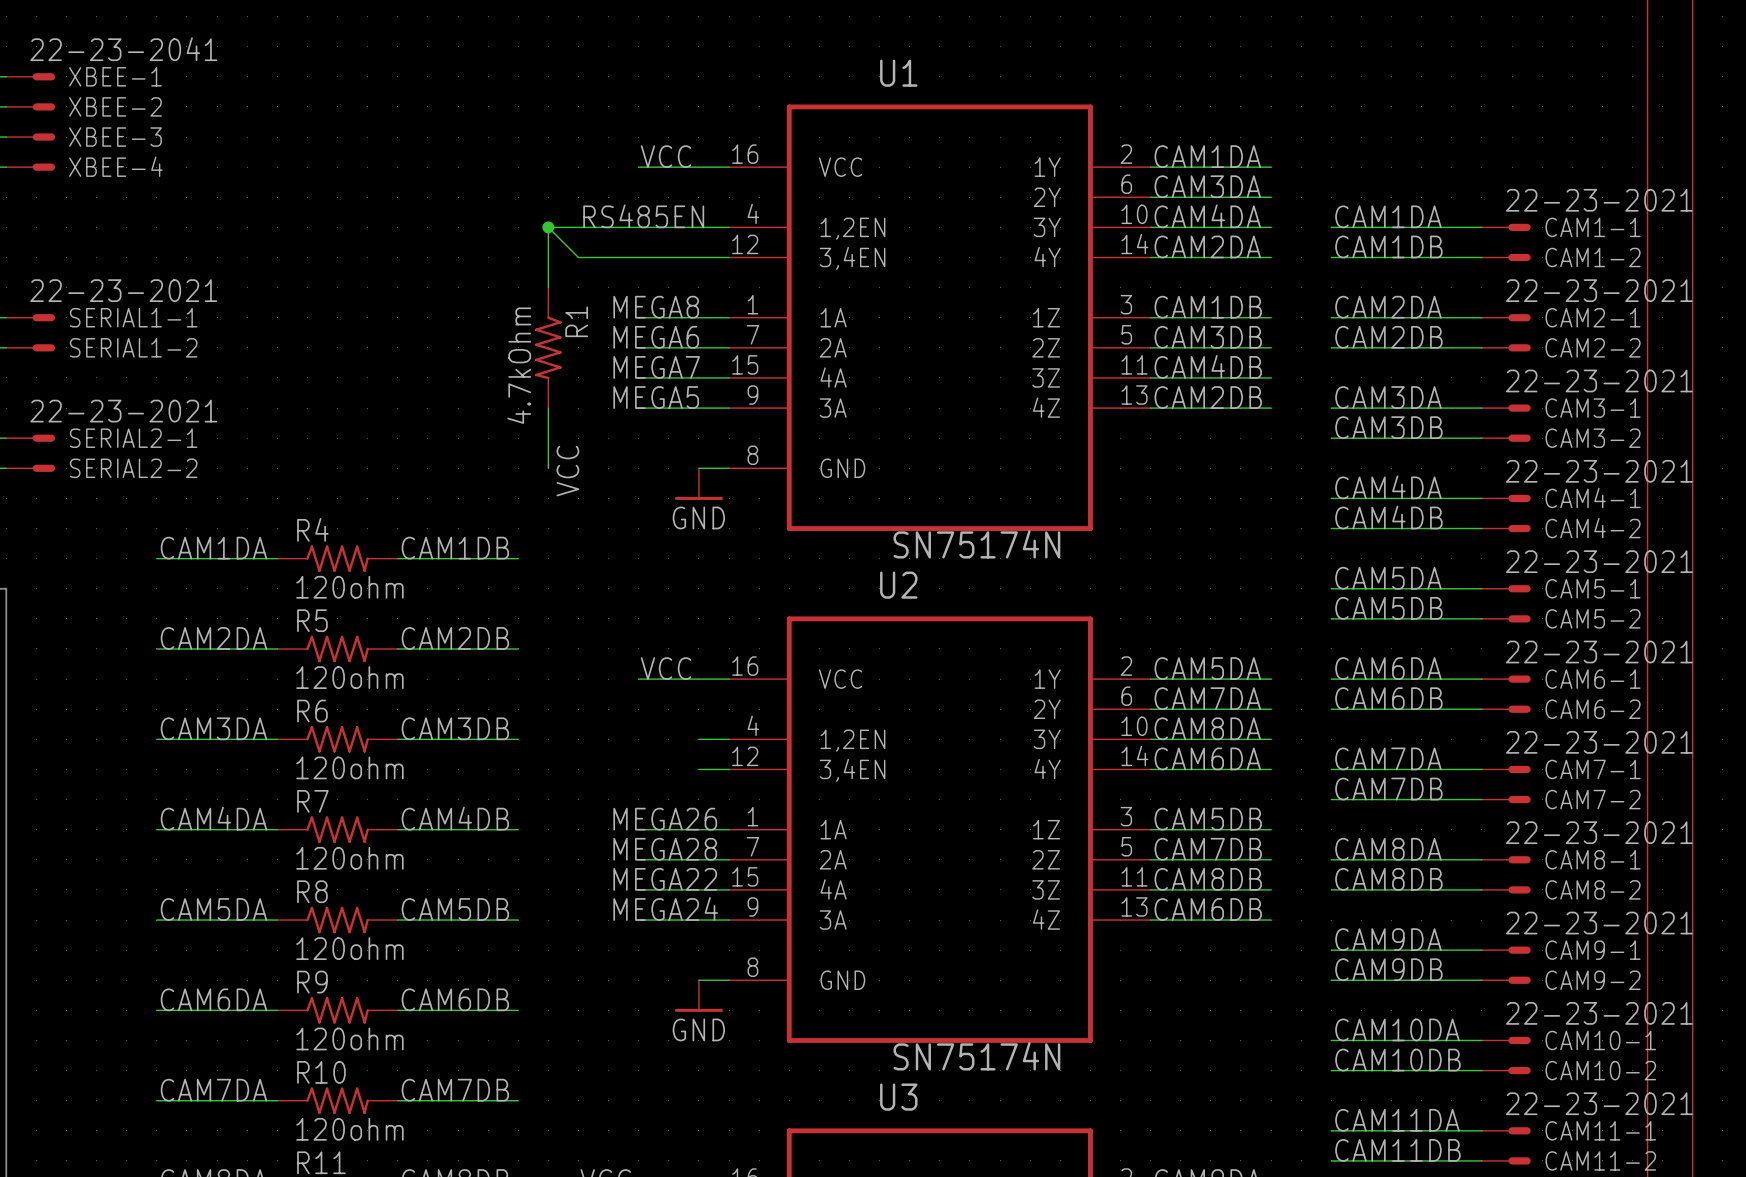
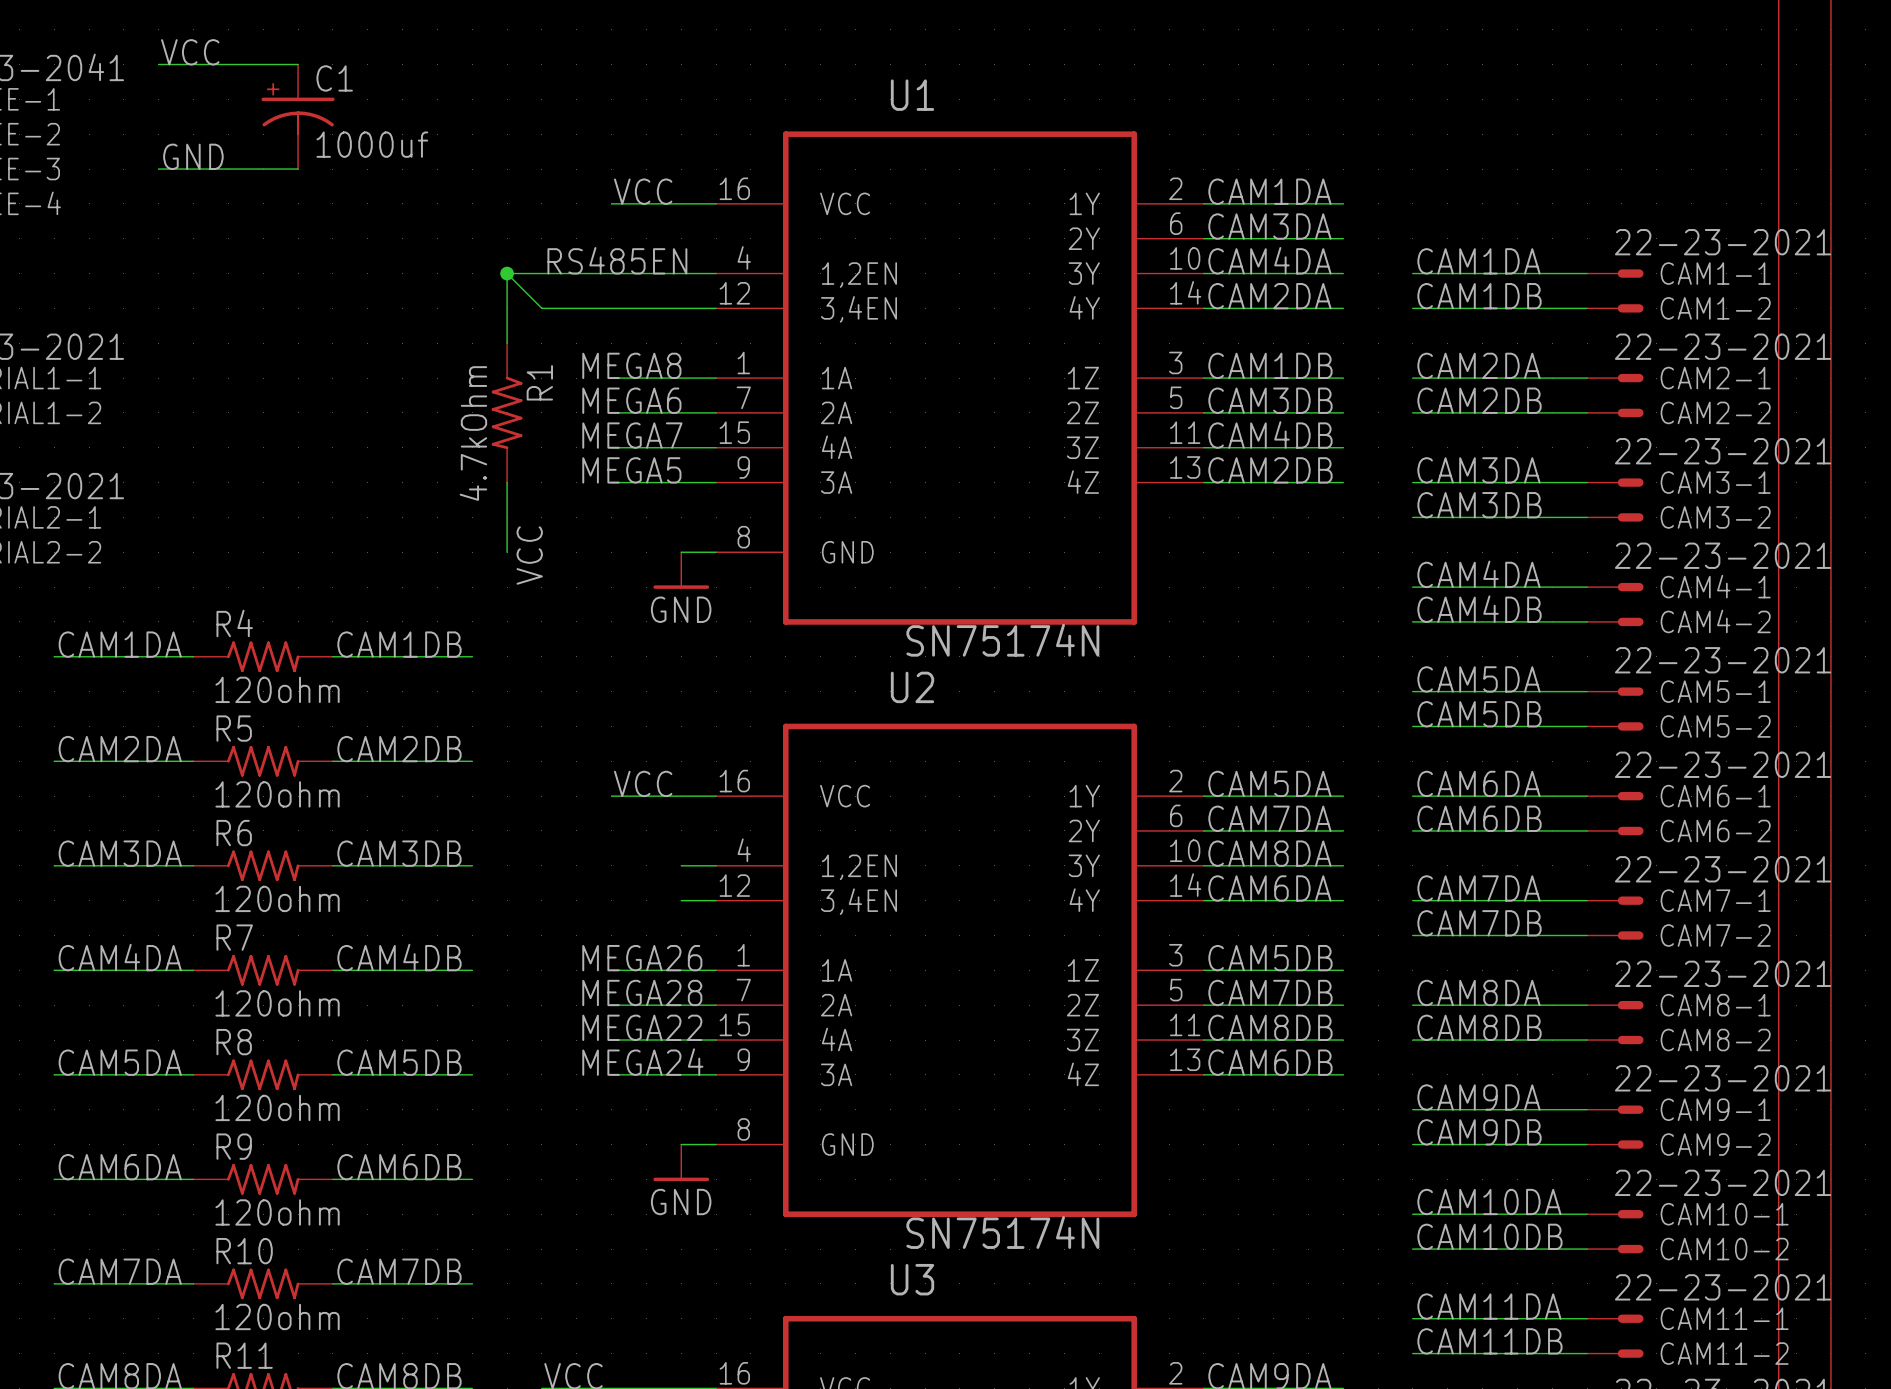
label: none -> VCC (190, 52)
wire: none -> (158, 64) (298, 64)
C1: none -> 1000uf (298, 116)
label: none -> GND (193, 156)
wire: none -> (158, 169) (298, 169)

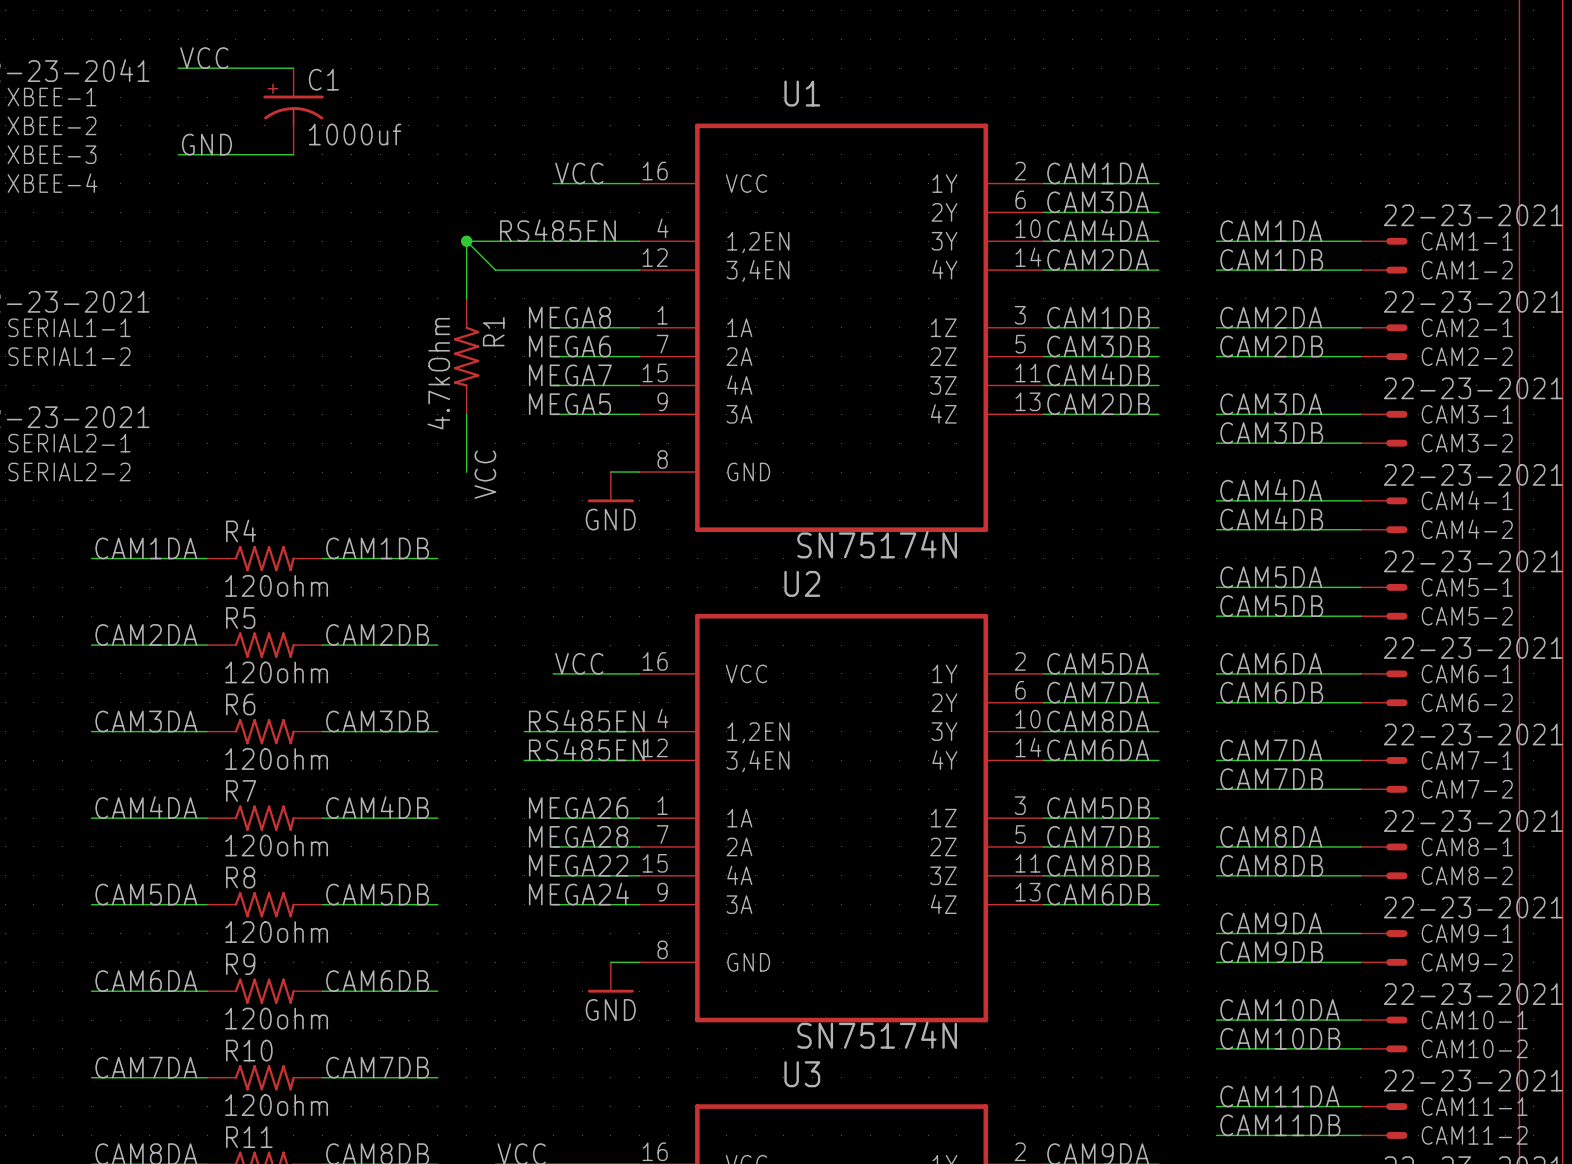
label: none -> RS485EN (586, 721)
wire: none -> (524, 731) (610, 731)
label: none -> RS485EN (586, 749)
wire: none -> (524, 760) (610, 760)

